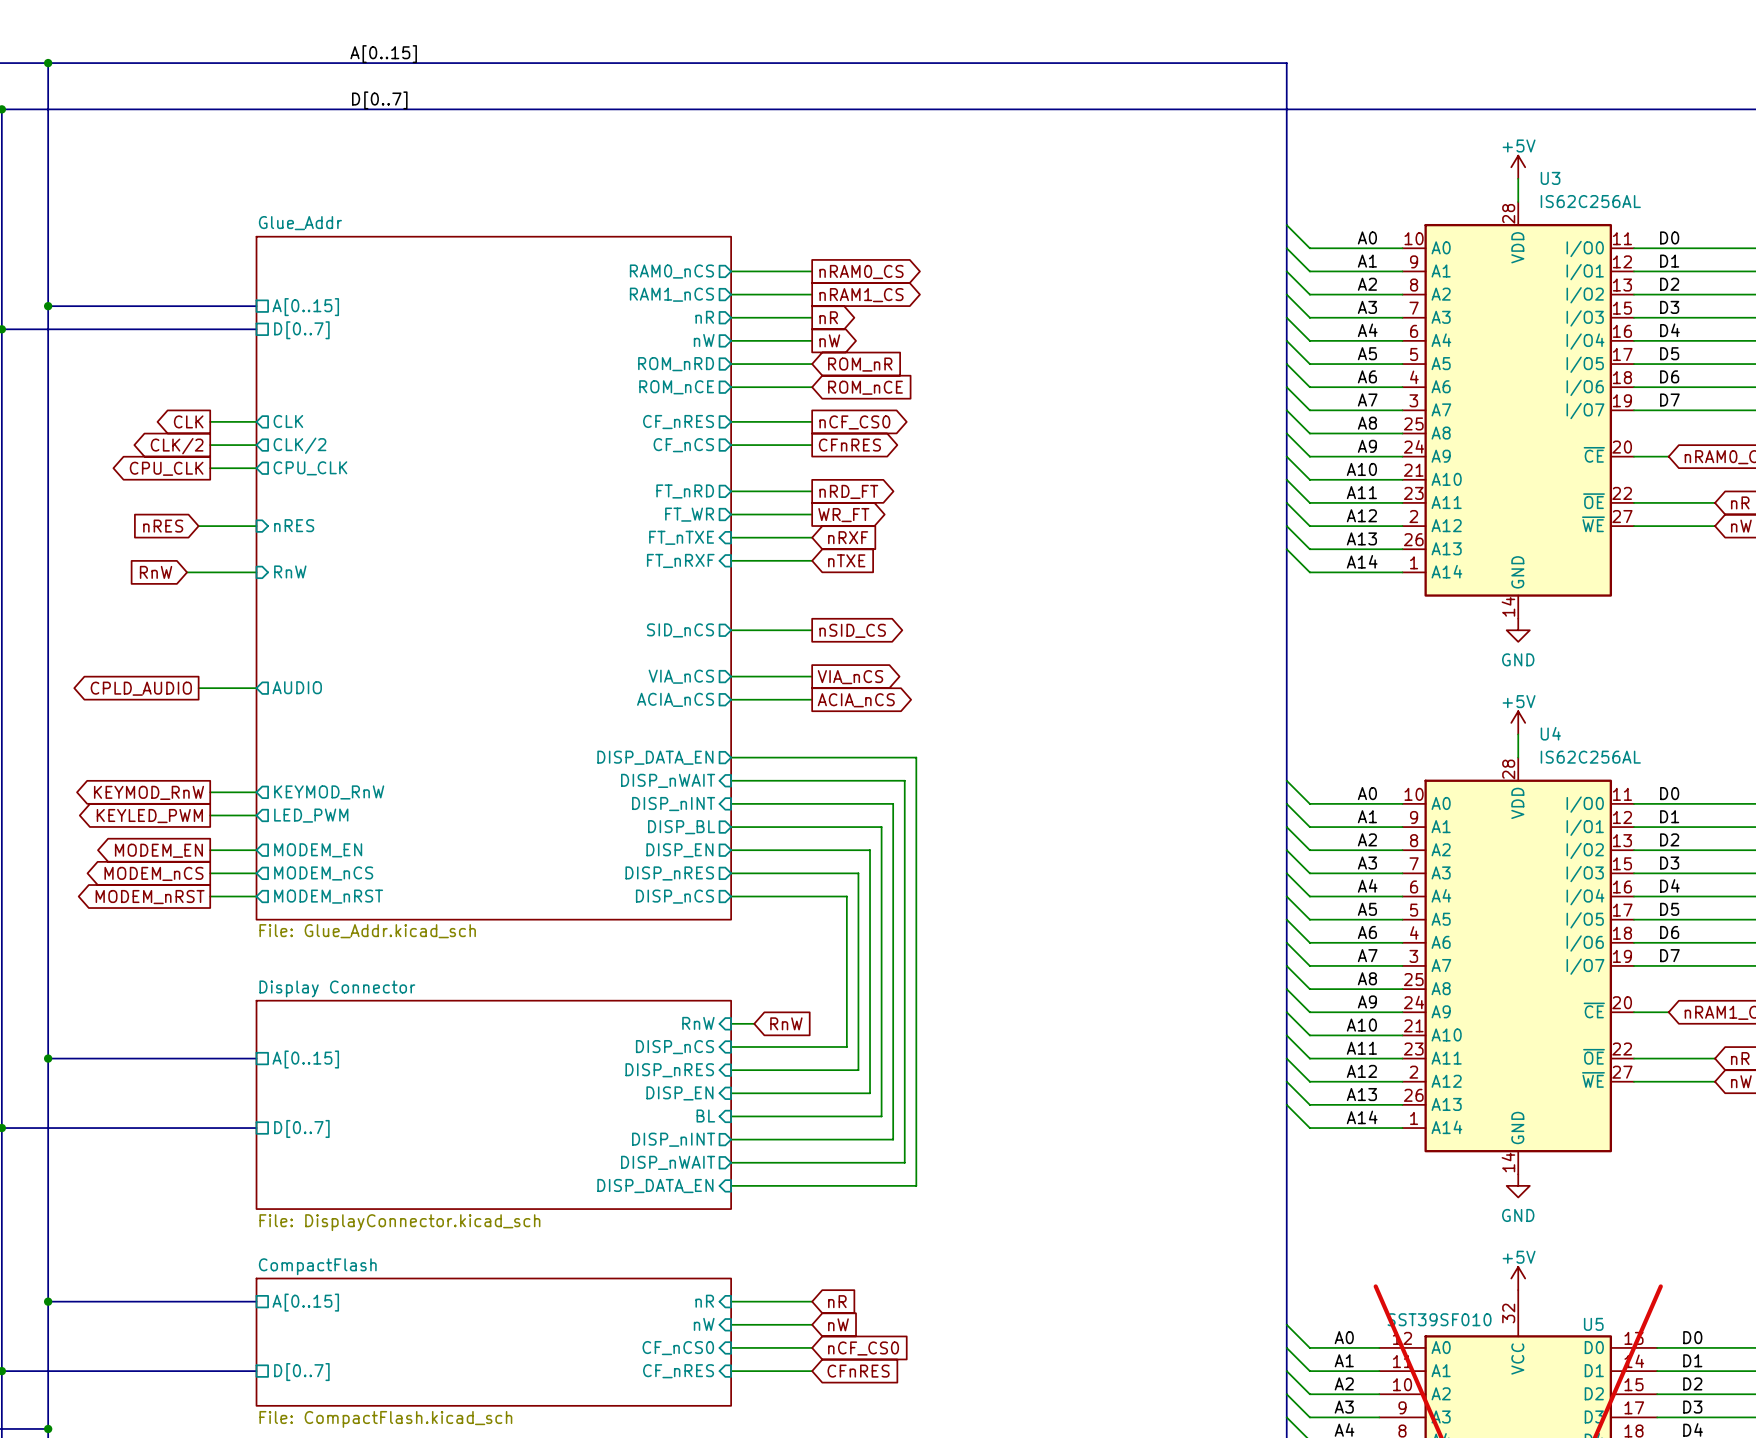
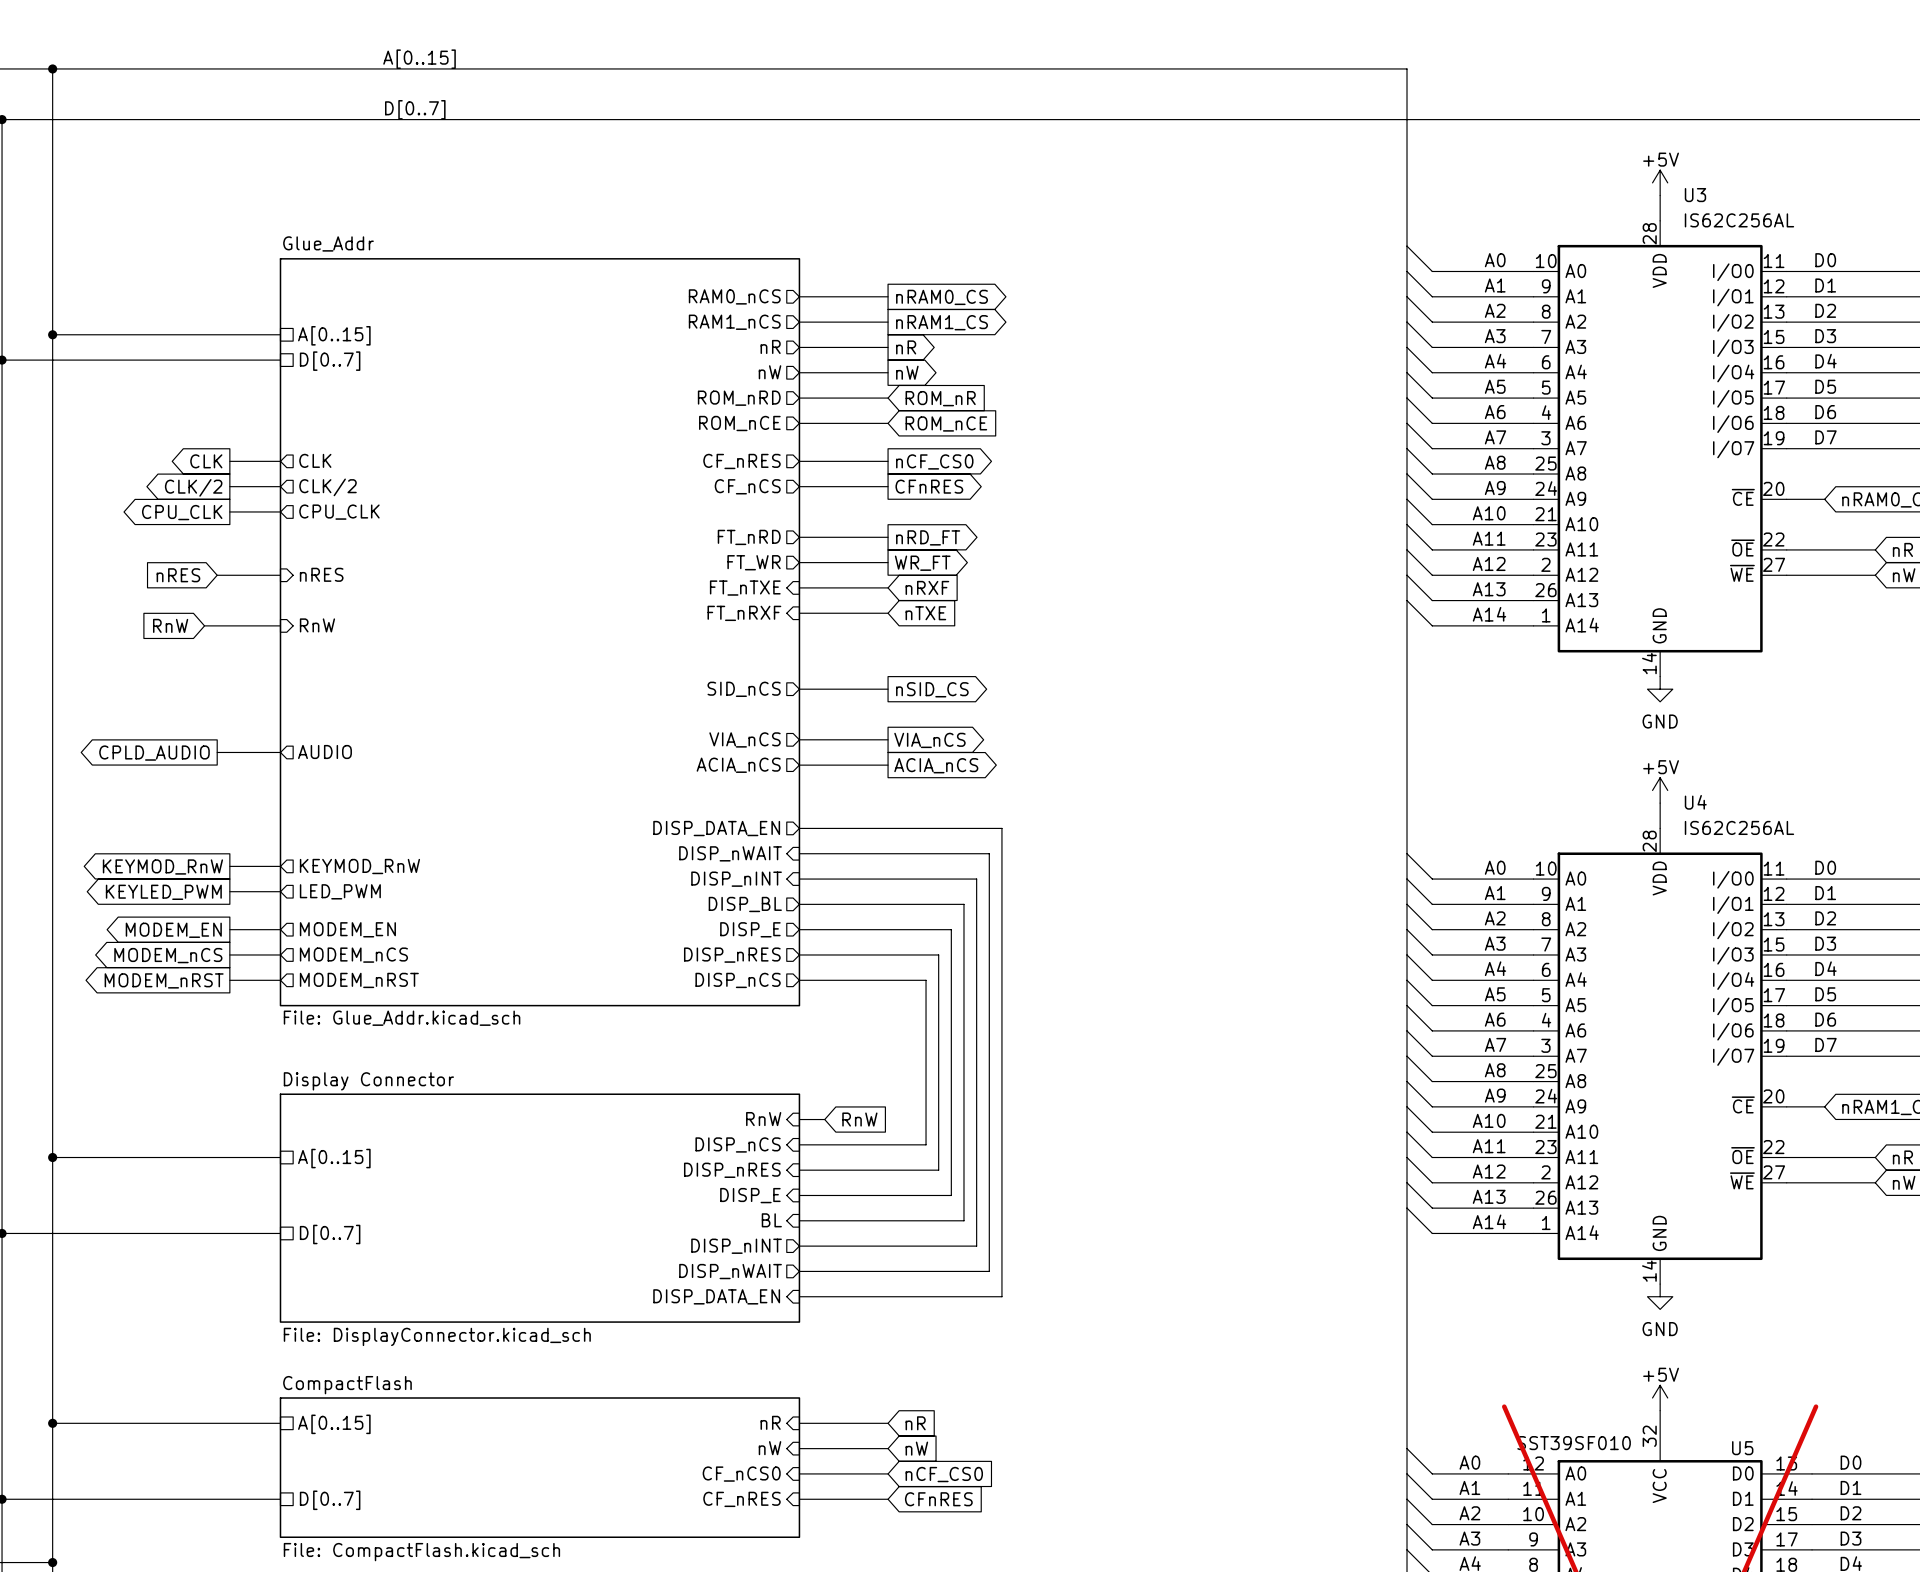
sheet pin: DISP_EN (679, 850) -> DISP_E (750, 929)
sheet pin: DISP_EN (679, 1093) -> DISP_E (750, 1195)

